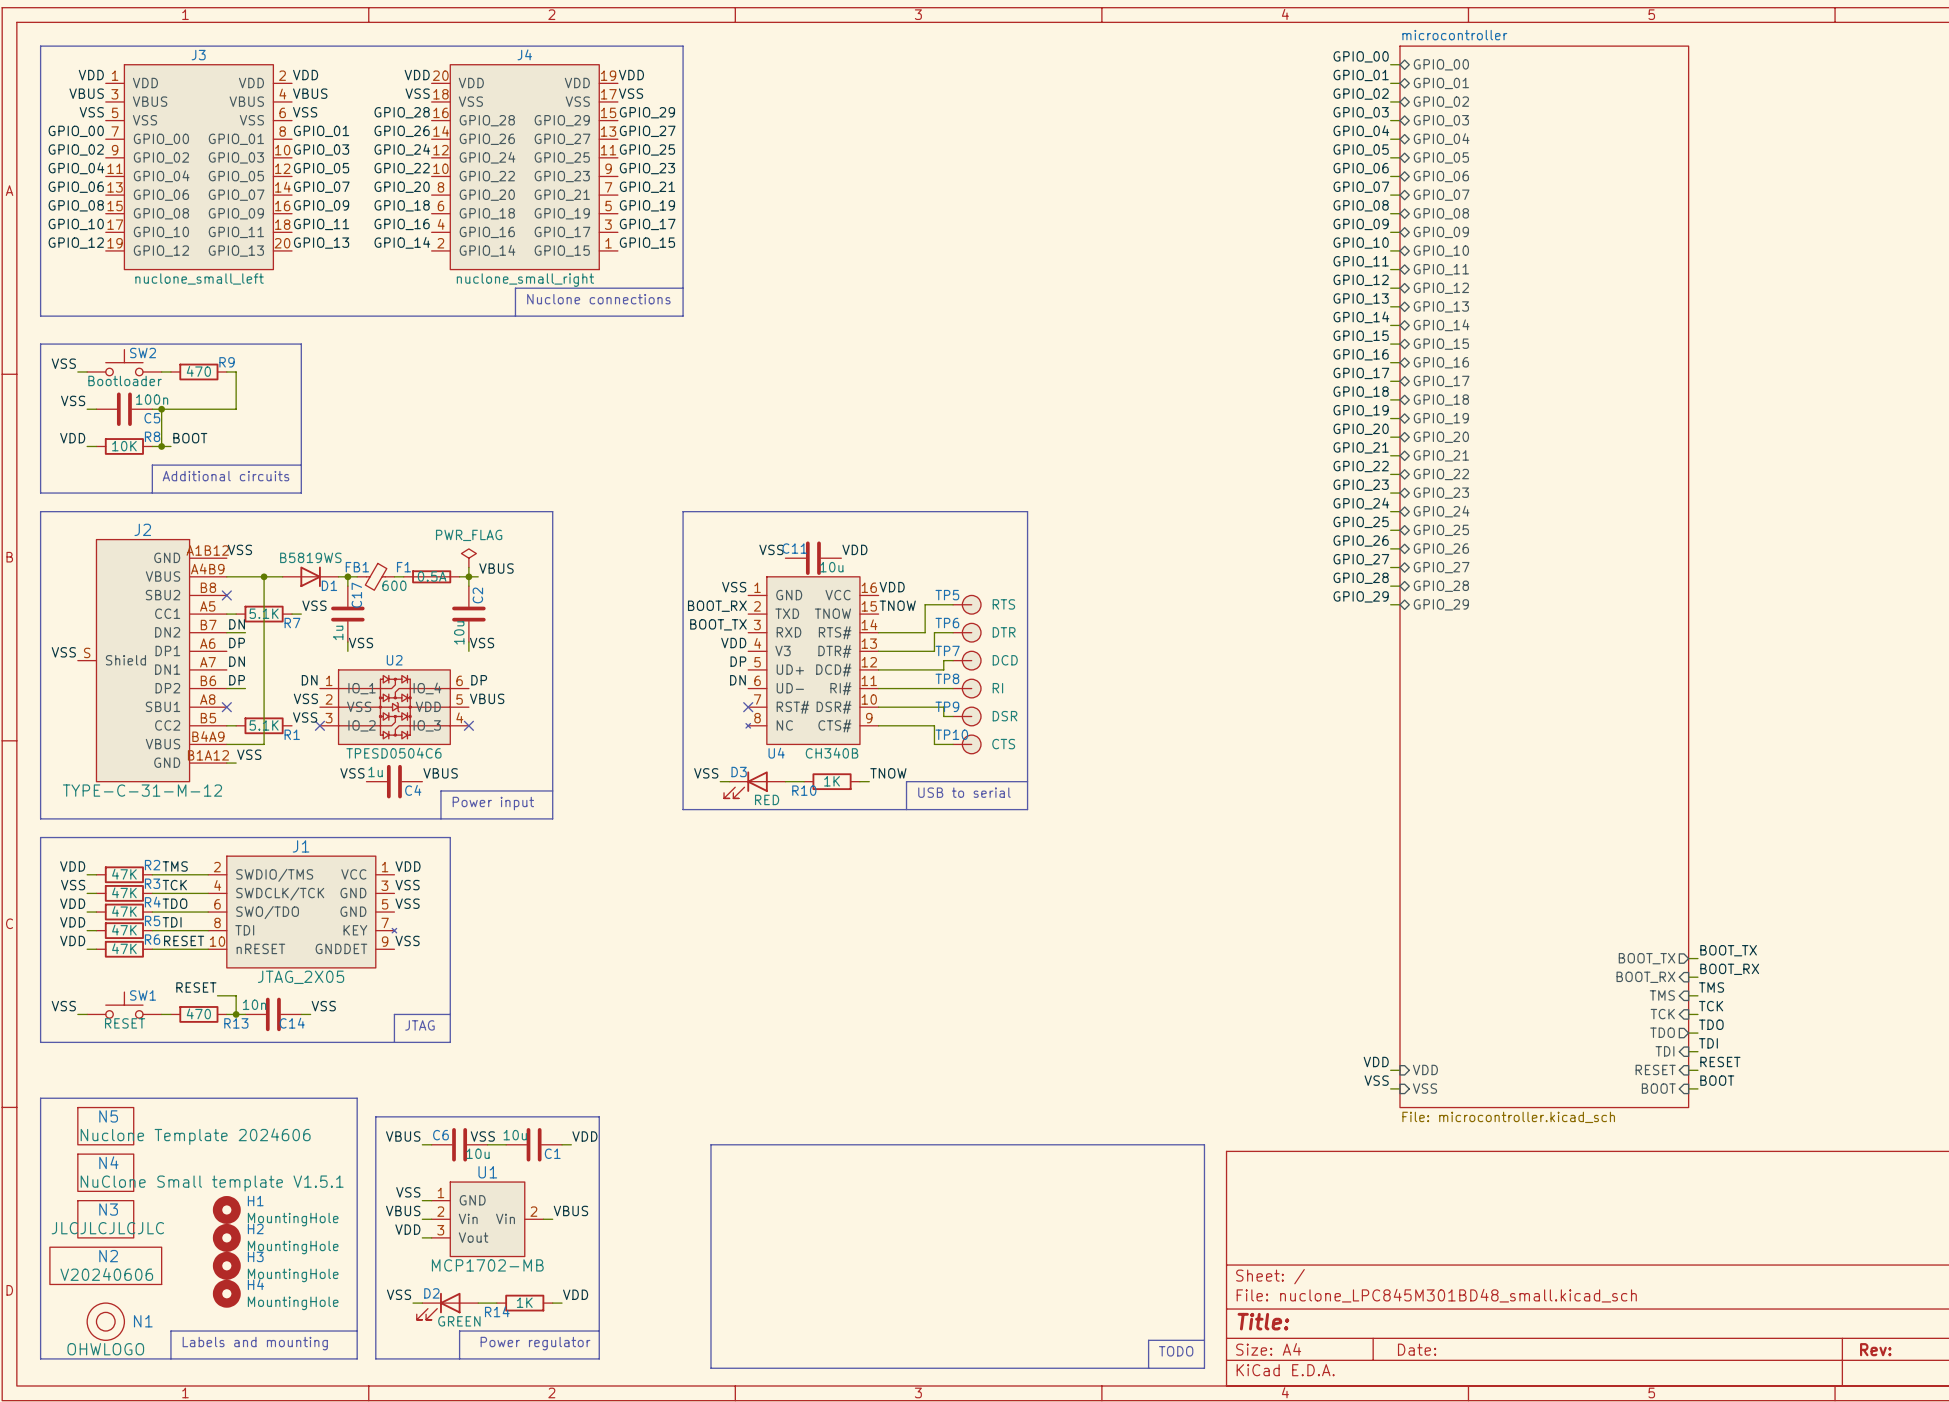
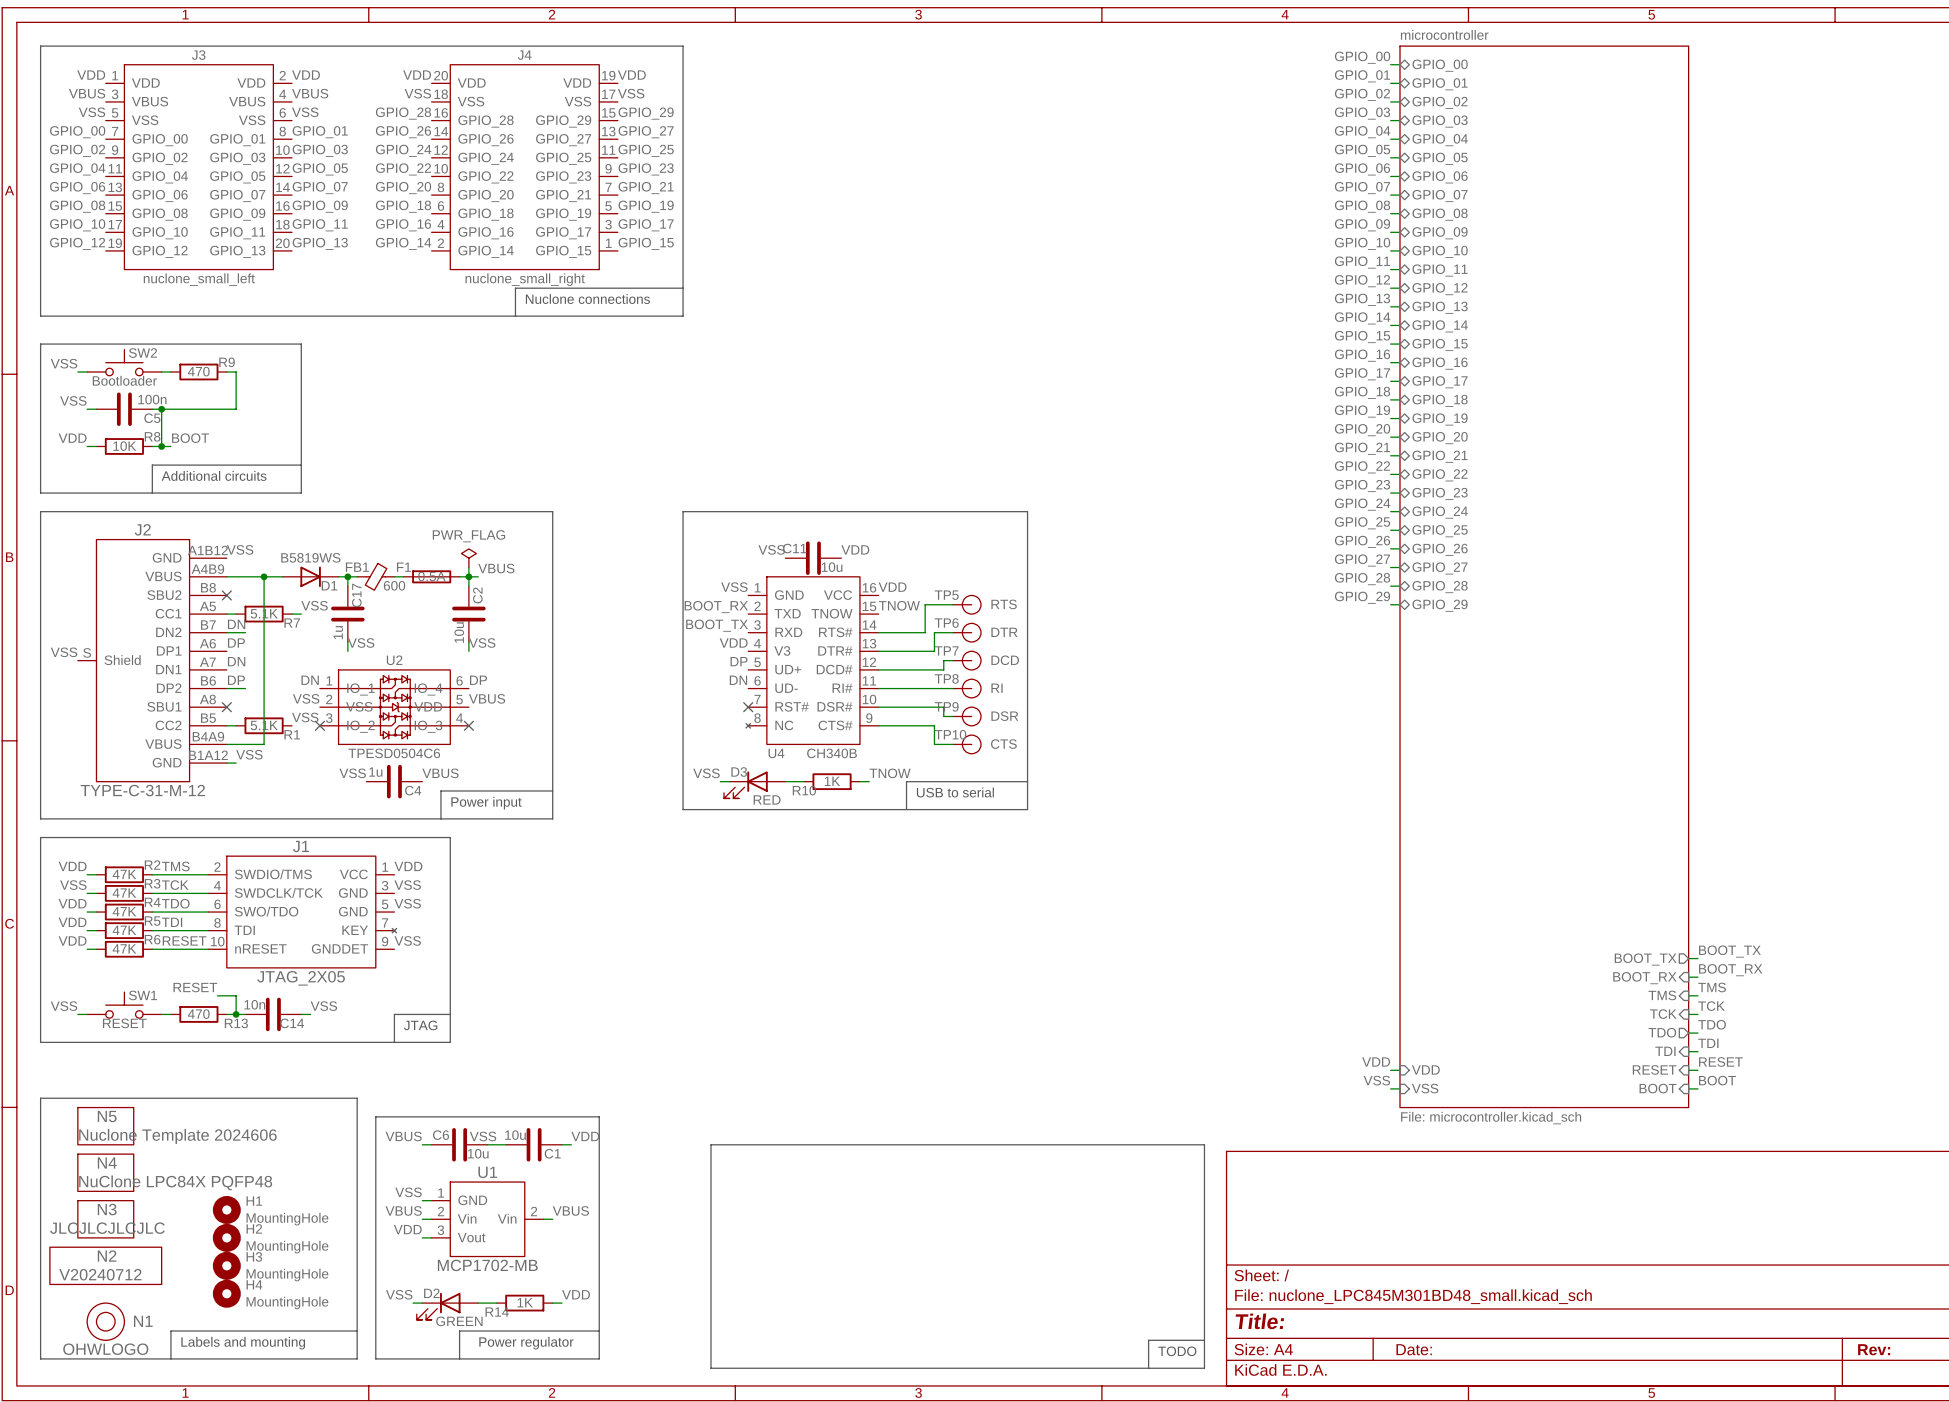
N4 value: NuClone Small template V1.5.1 (212, 1183) -> NuClone LPC84X PQFP48 (175, 1182)
N2 value: V20240606 (106, 1274) -> V20240712 (100, 1274)

